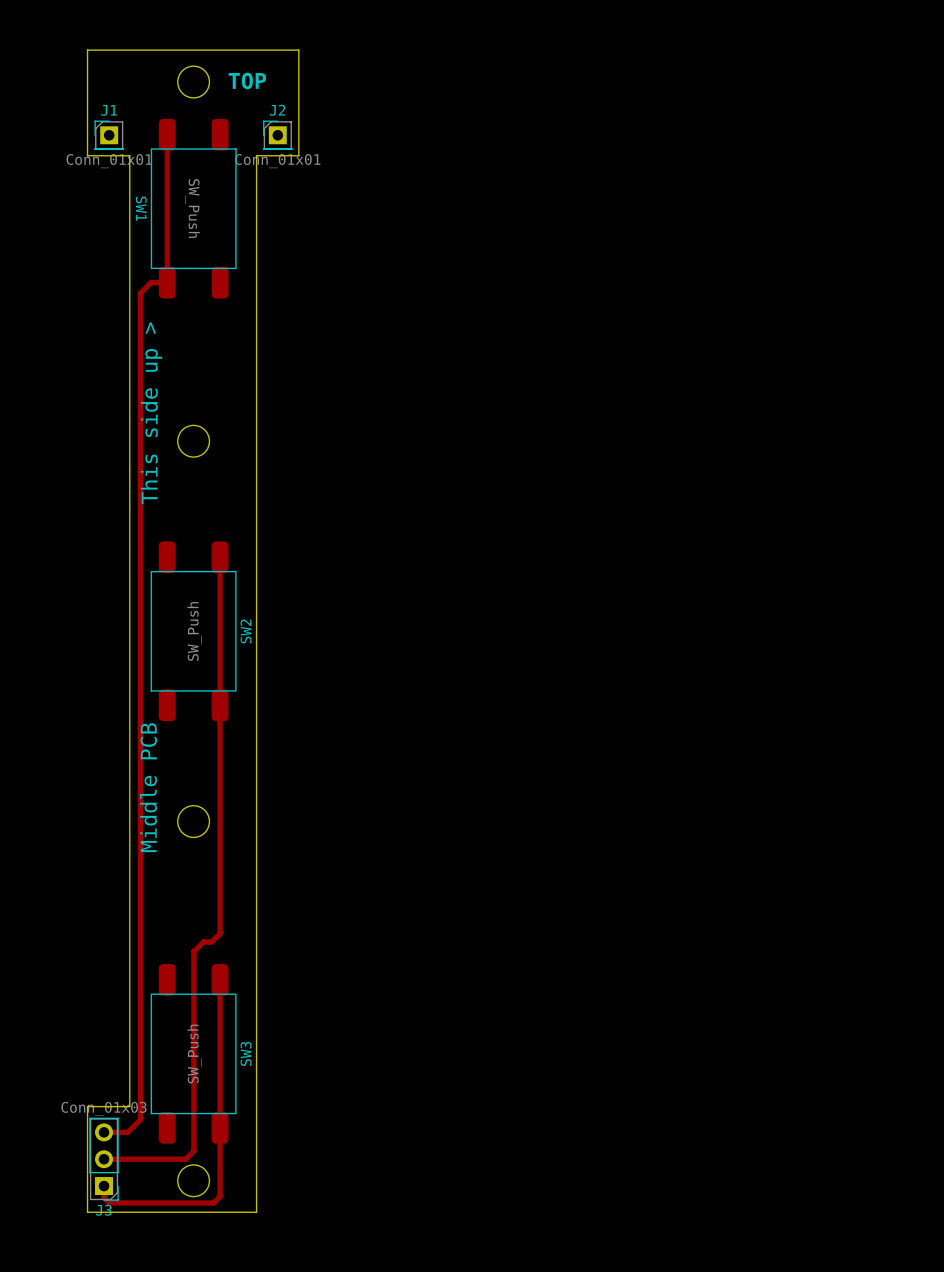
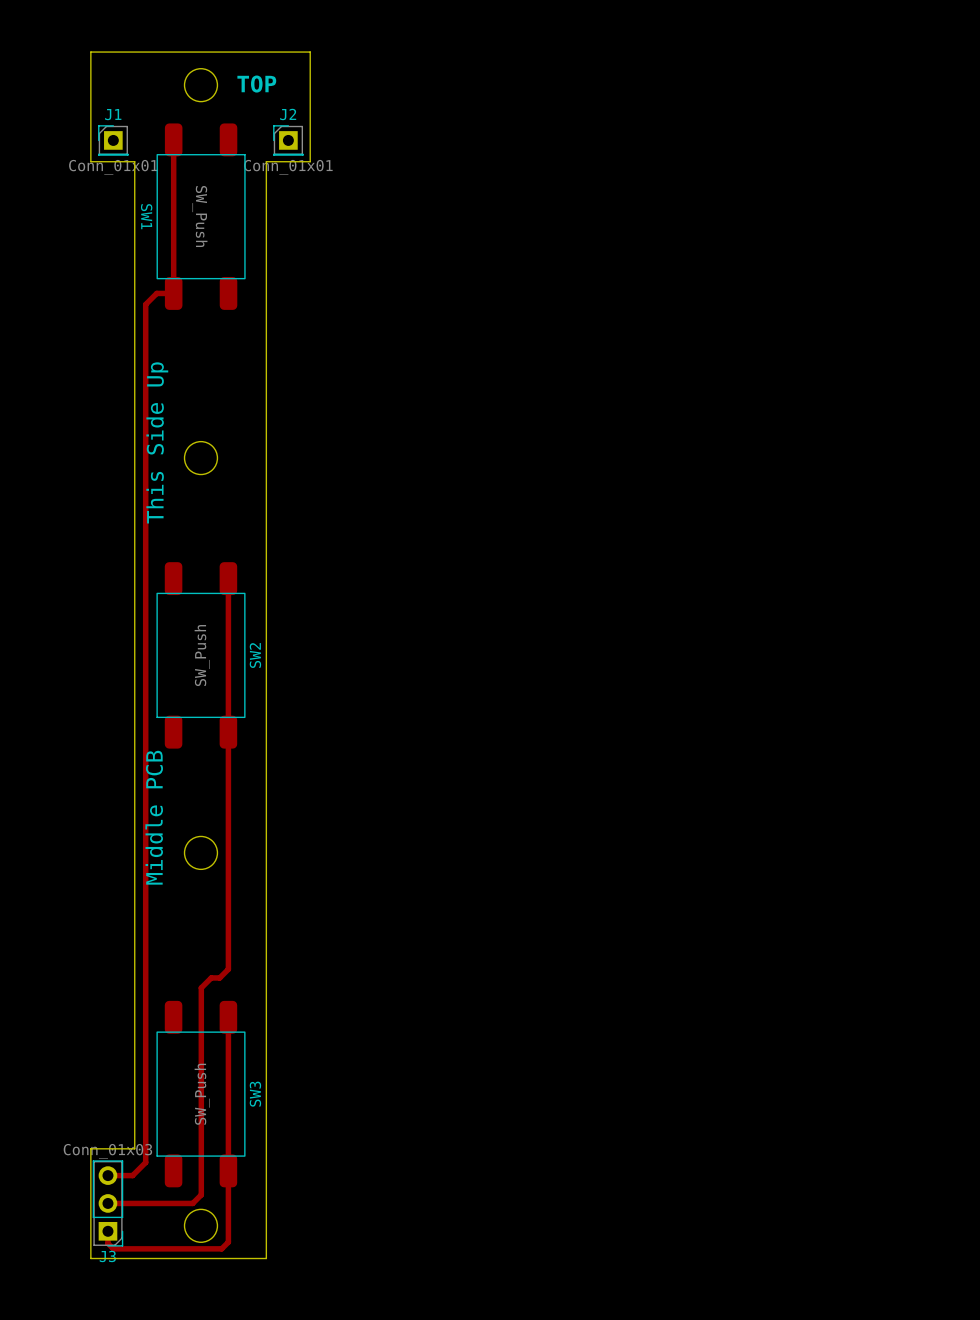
text: This side up > (151, 413) -> This Side Up (157, 442)

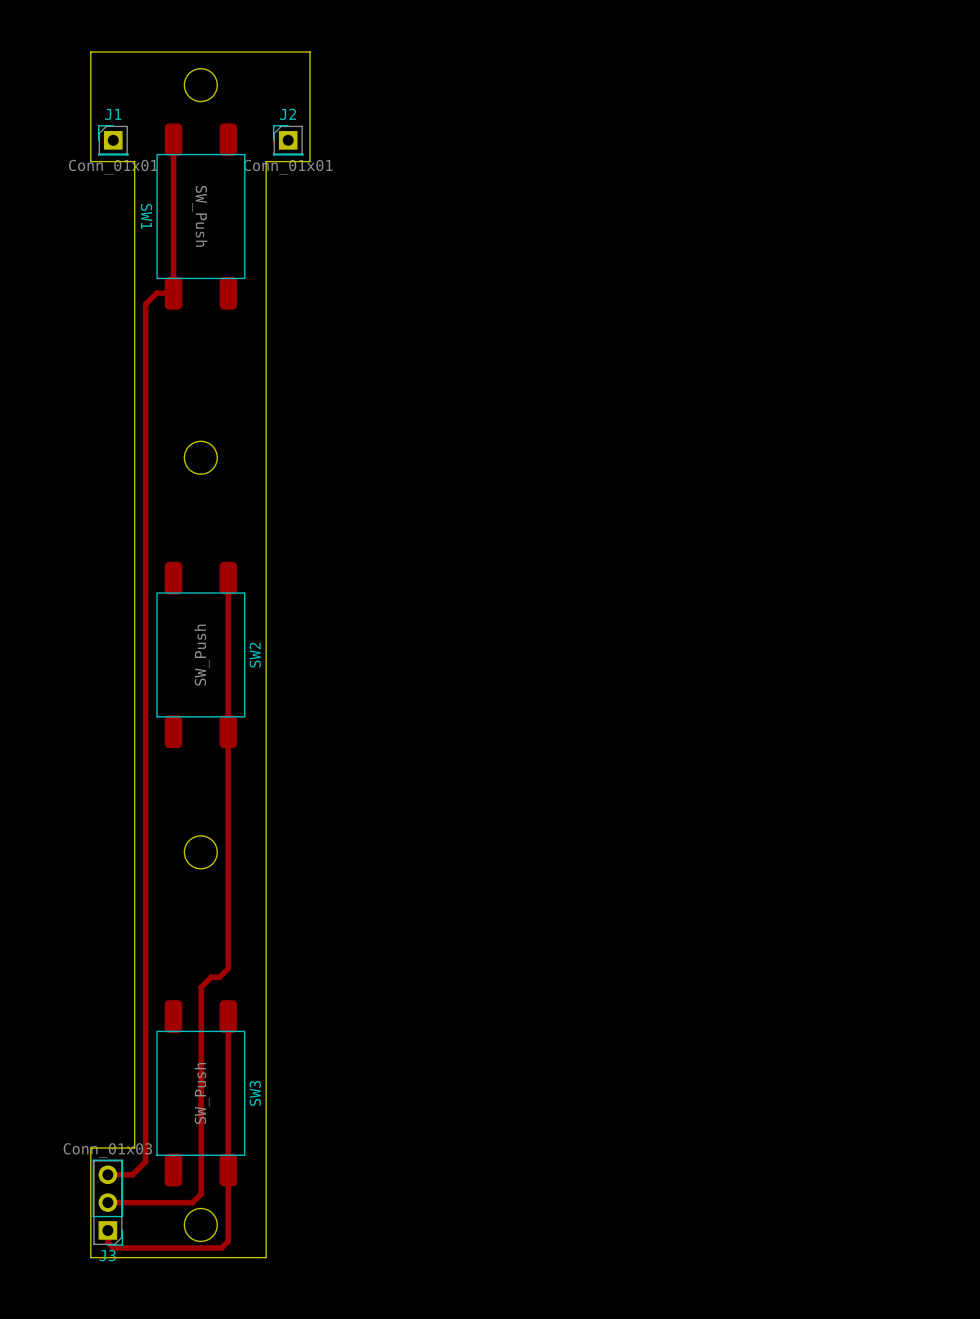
text: TOP (256, 84) -> none
text: This Side Up (157, 442) -> none
text: Middle PCB (154, 817) -> none

